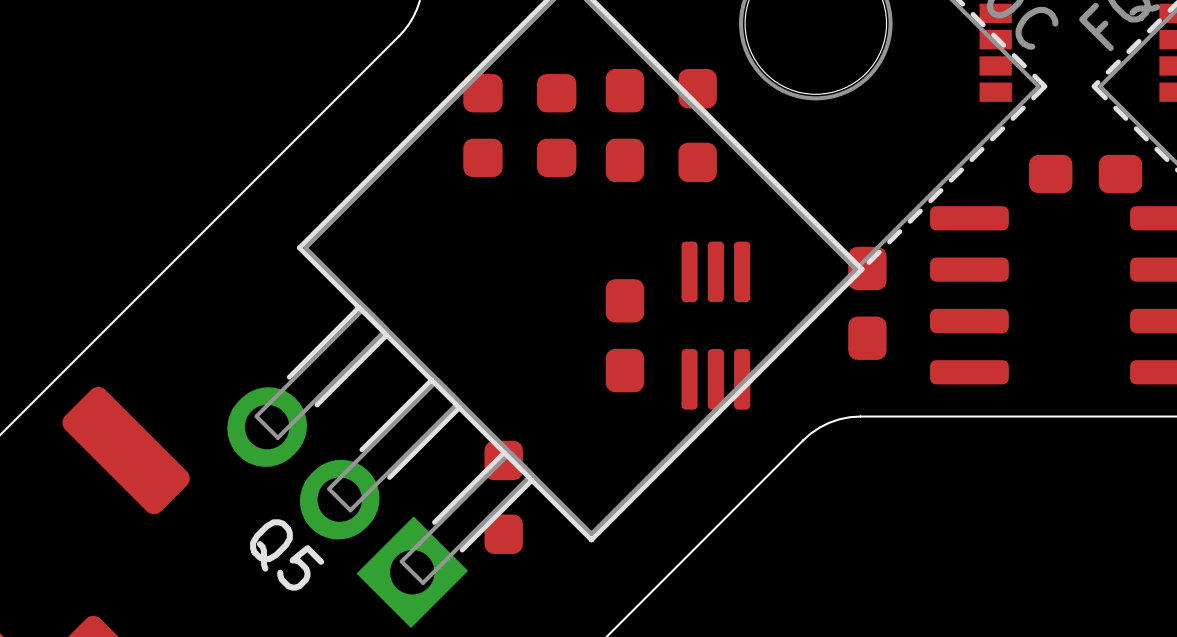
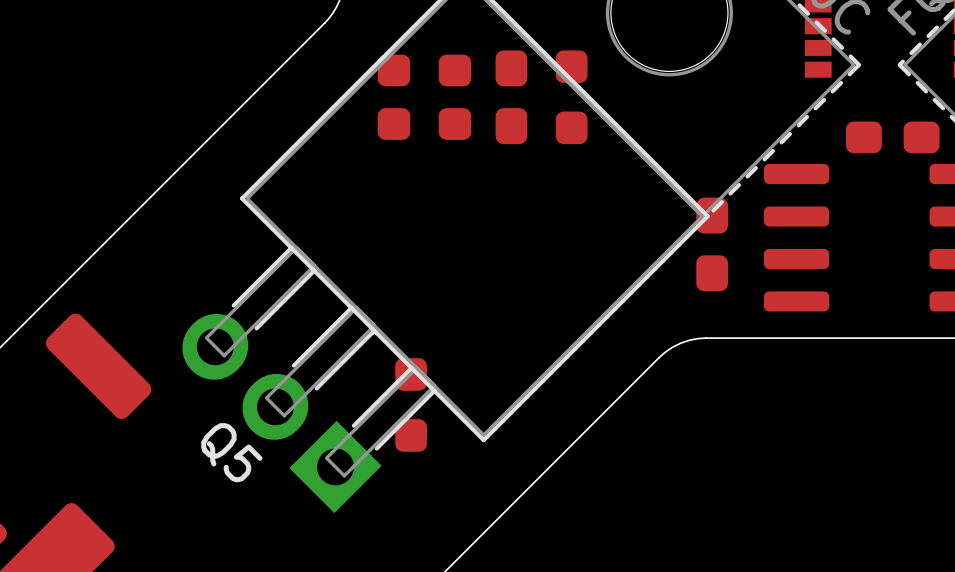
part: (715, 325) -> none
part: (624, 335) -> none

